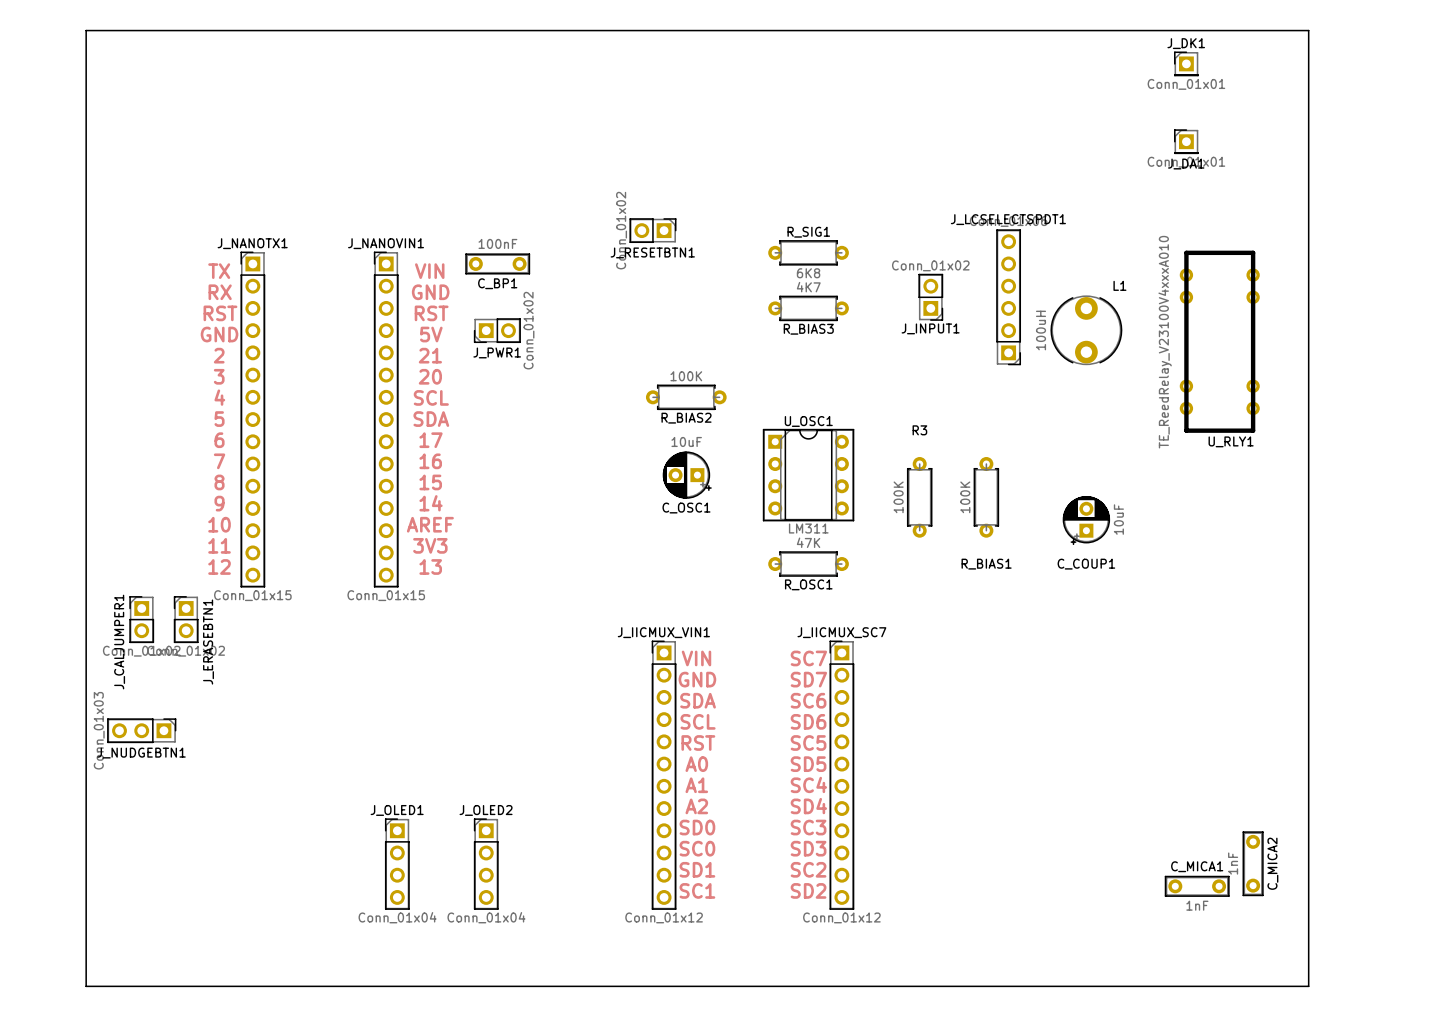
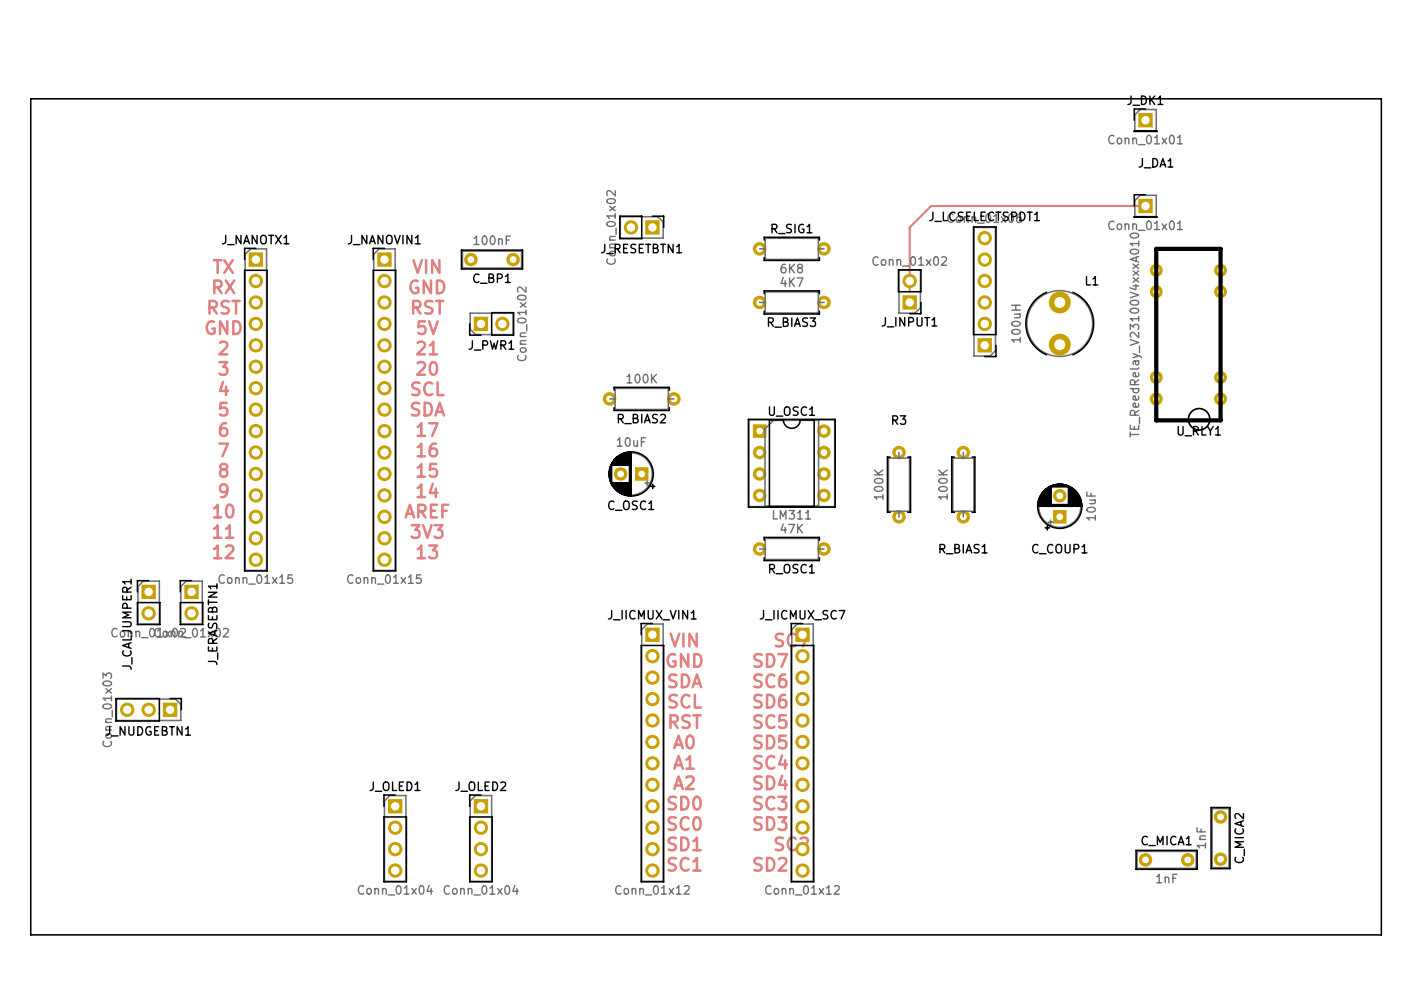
board edge: (86, 30) (1308, 30) (1308, 986) (86, 986) (86, 30) -> (30, 98) (30, 934) (1381, 934) (1381, 98) (30, 98)
J_DK1 position: (1186, 63) -> (1145, 120)
J_DA1 position: (1186, 141) -> (1145, 205)
track: none -> (1145, 205) (931, 205) (909, 227) (909, 291)
R_BIAS2 position: (686, 397) -> (641, 398)
drawing: none -> [1187, 407, 1211, 431]
C_OSC1 position: (687, 475) -> (631, 473)
text position: SD7 (808, 679) -> SD7 (770, 660)
text position: SC6 (808, 700) -> SC6 (770, 680)
text position: SD6 (808, 721) -> SD6 (770, 701)
text position: SC5 (808, 743) -> SC5 (770, 721)
text position: SD5 (808, 764) -> SD5 (770, 741)
J_IICMUX_SC7 position: (841, 775) -> (802, 752)
text position: SC4 (808, 784) -> SC4 (770, 762)
text position: SD4 (808, 806) -> SD4 (770, 782)
text position: SC3 (808, 827) -> SC3 (770, 803)
text position: SD3 (808, 848) -> SD3 (770, 823)
text position: SD2 (808, 890) -> SD2 (770, 864)

